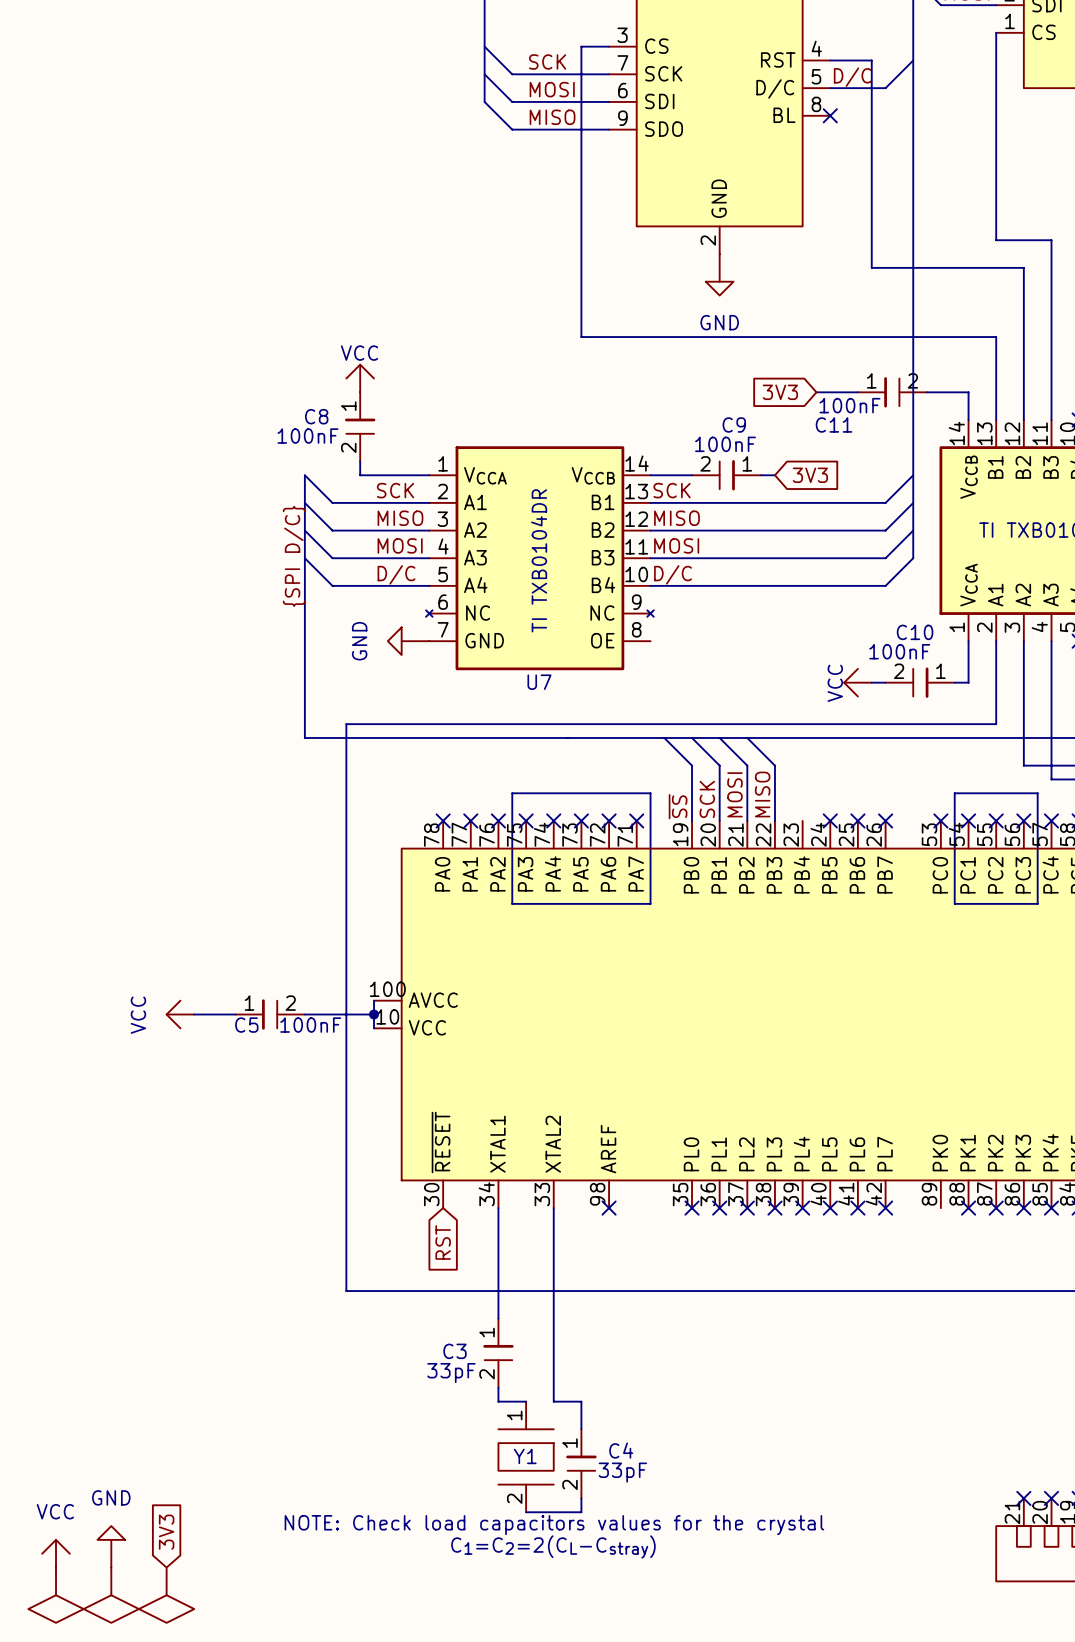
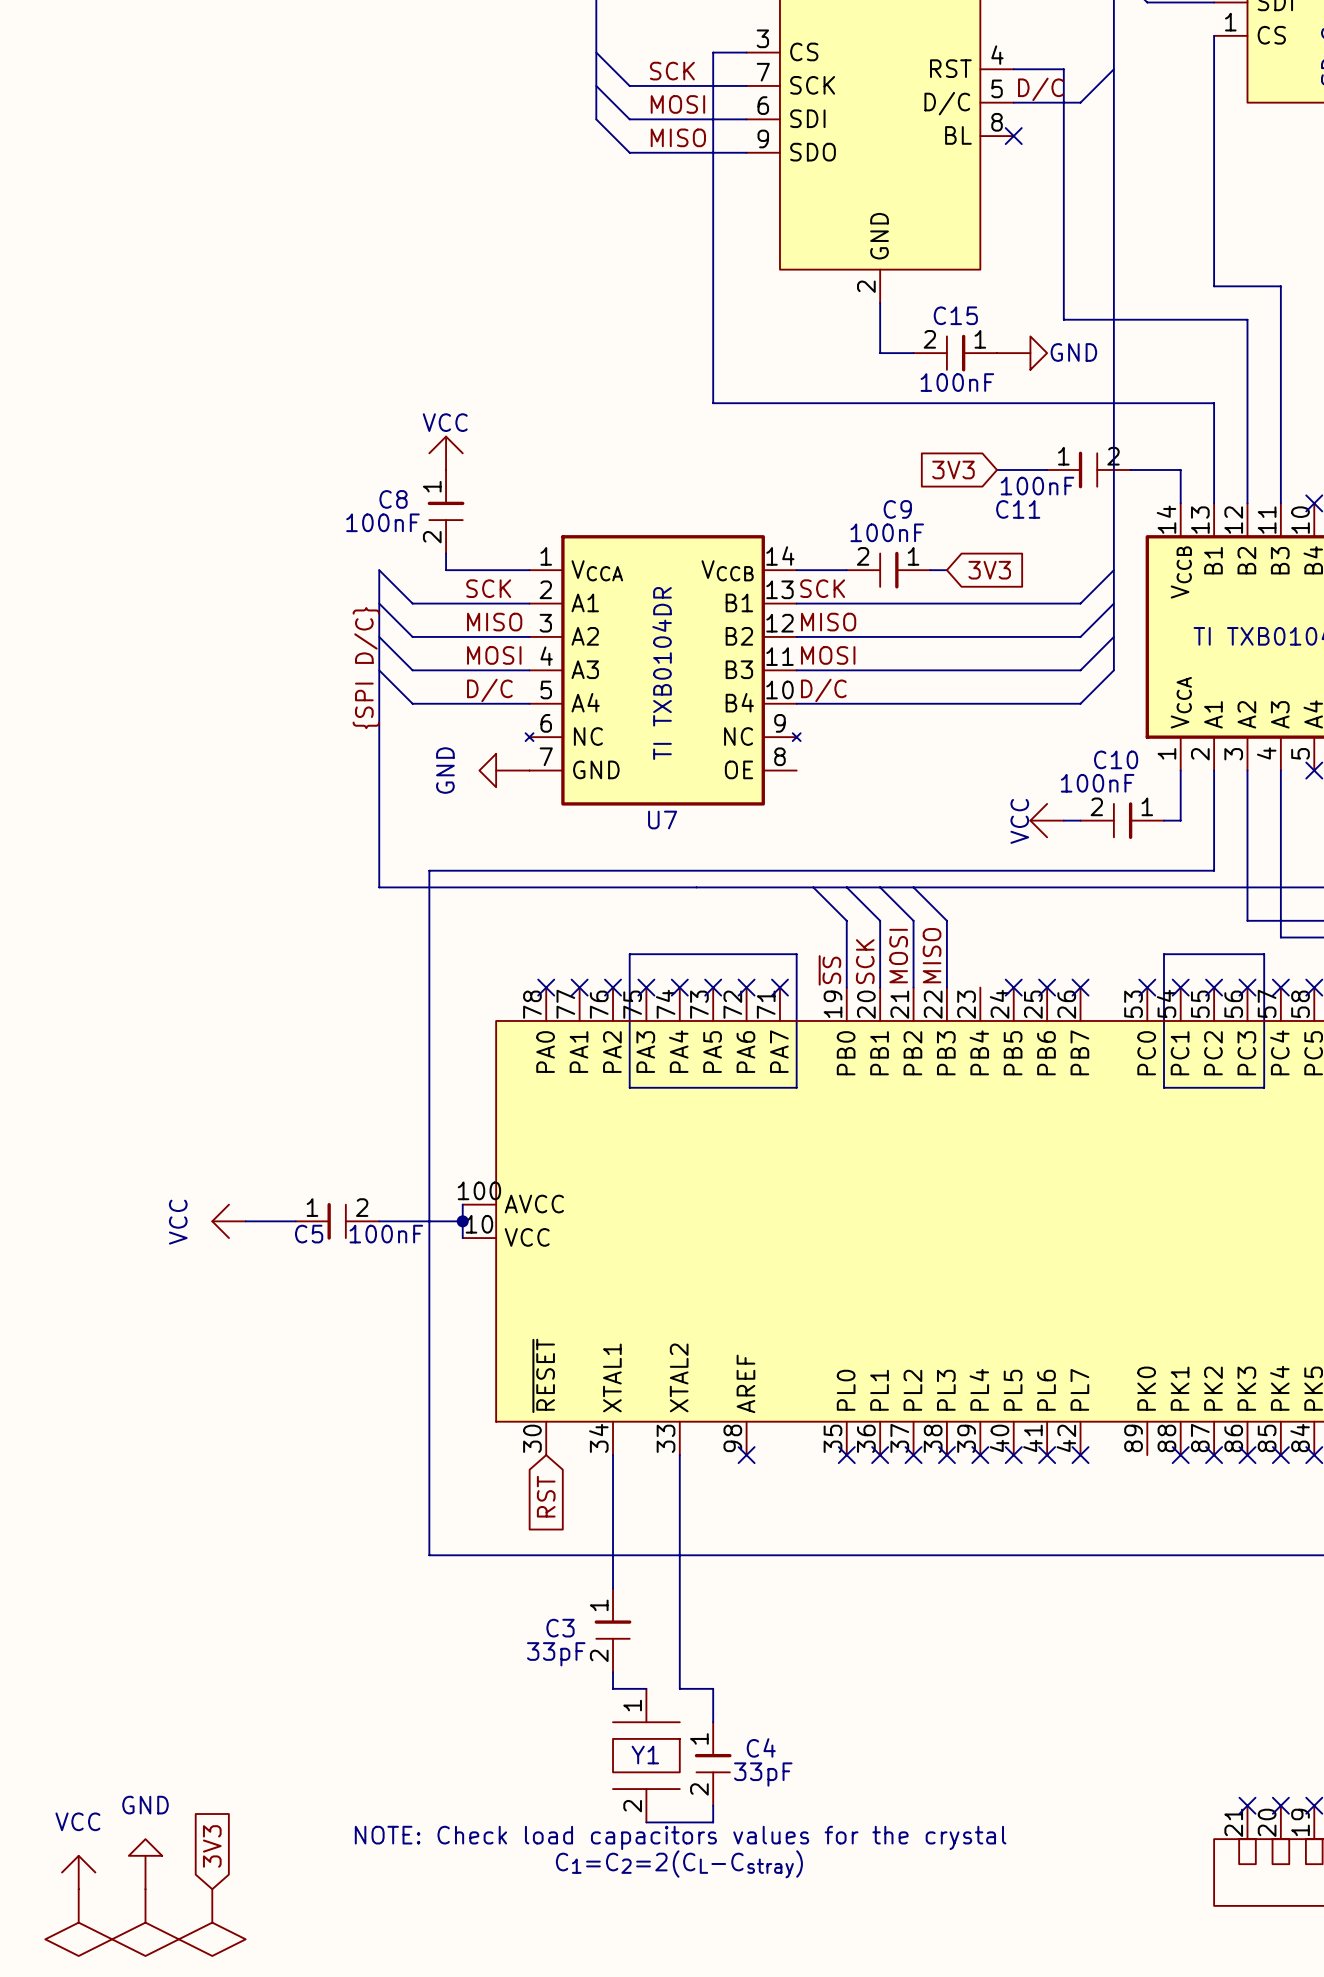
wire: none -> (880, 303) (880, 353) (913, 353)
power symbol position: GND (719, 274) -> GND (1022, 353)
power symbol rotation: 0° (719, 288) -> 90° counterclockwise (1038, 353)
C15: none -> 100nF (955, 353)

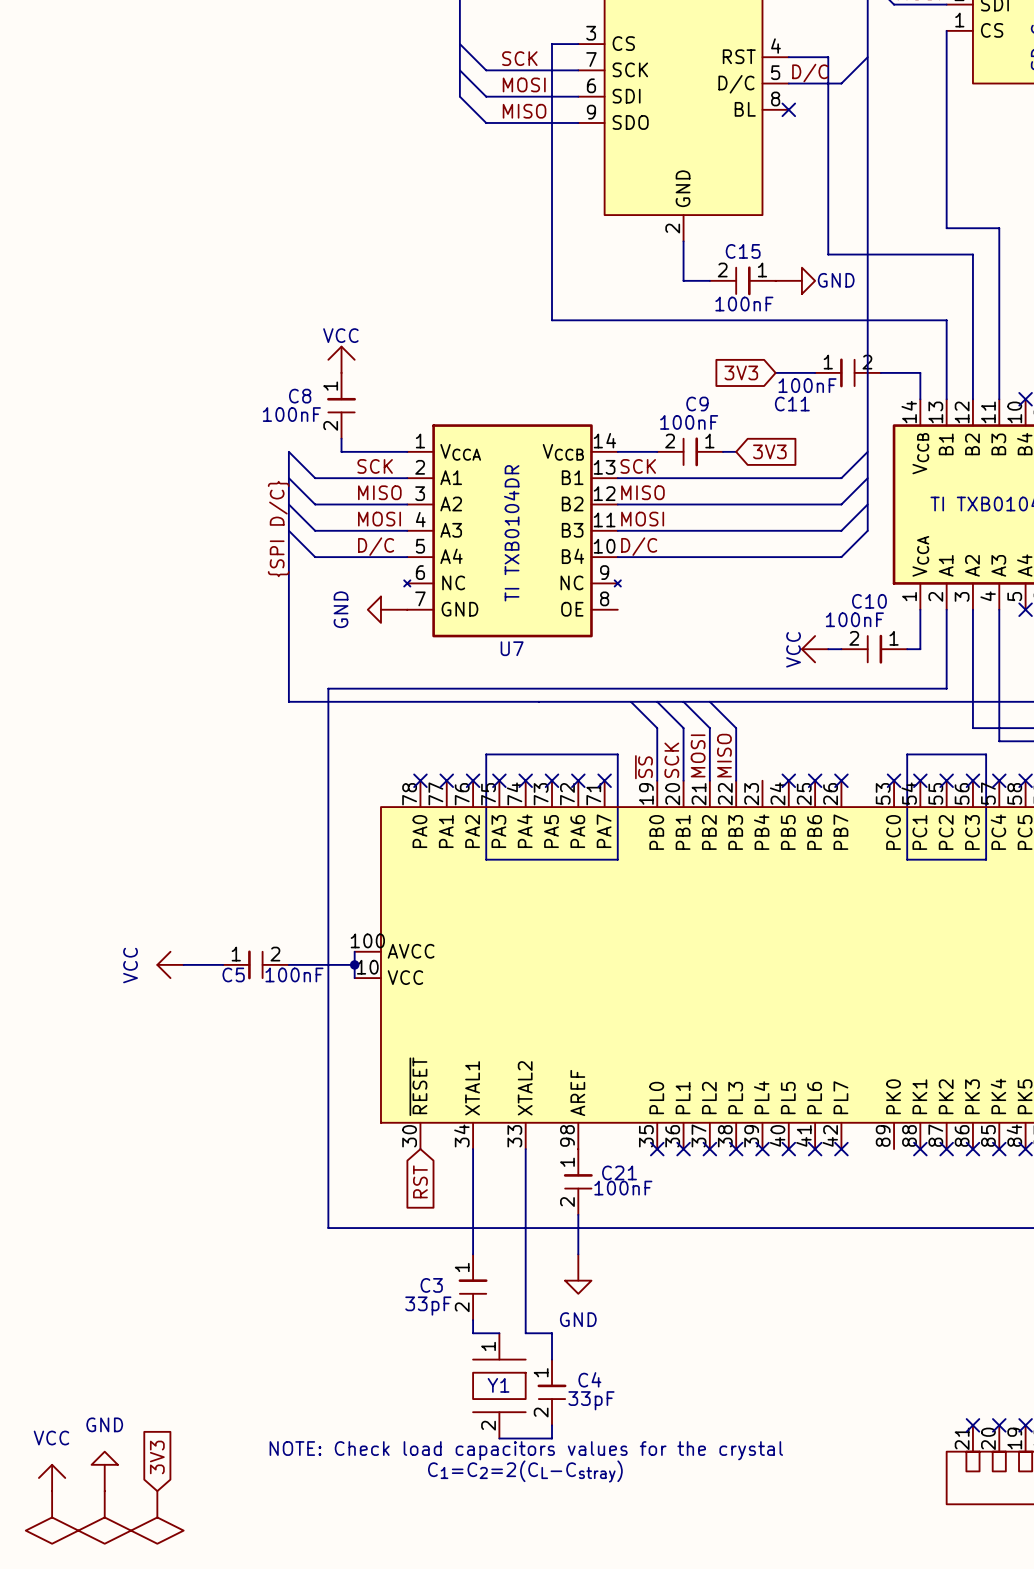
no-connect mark: (746, 1455) -> none
C21: none -> 100nF (578, 1181)
wire: none -> (578, 1214) (578, 1254)
power symbol: none -> GND (578, 1274)

